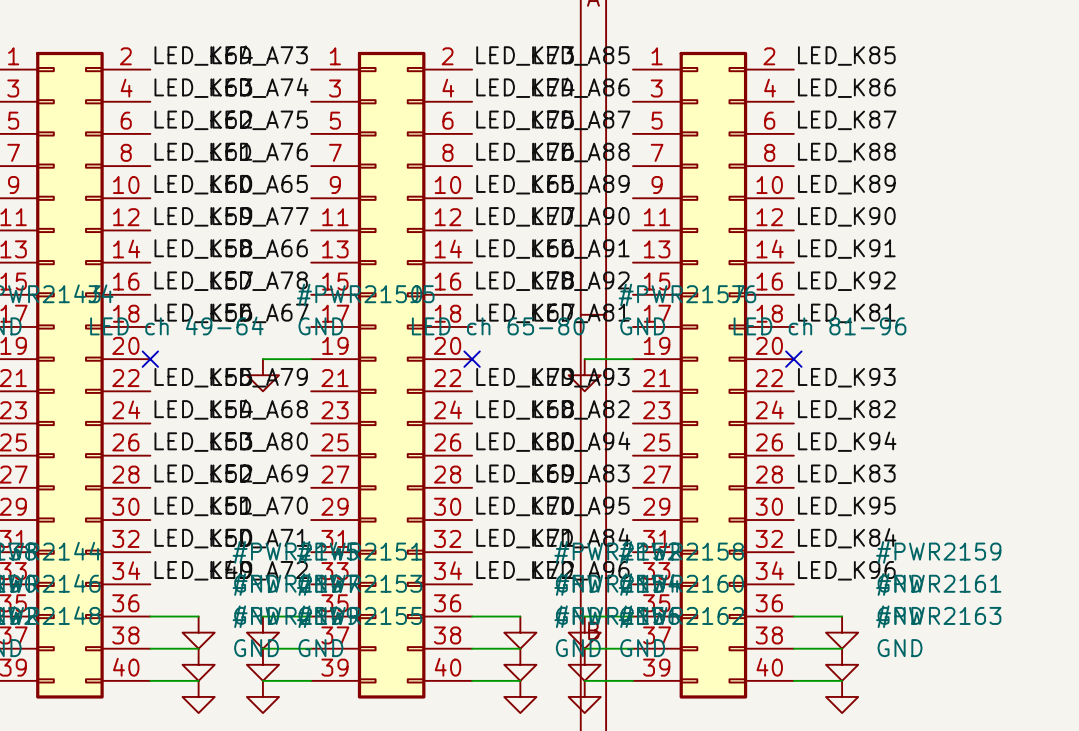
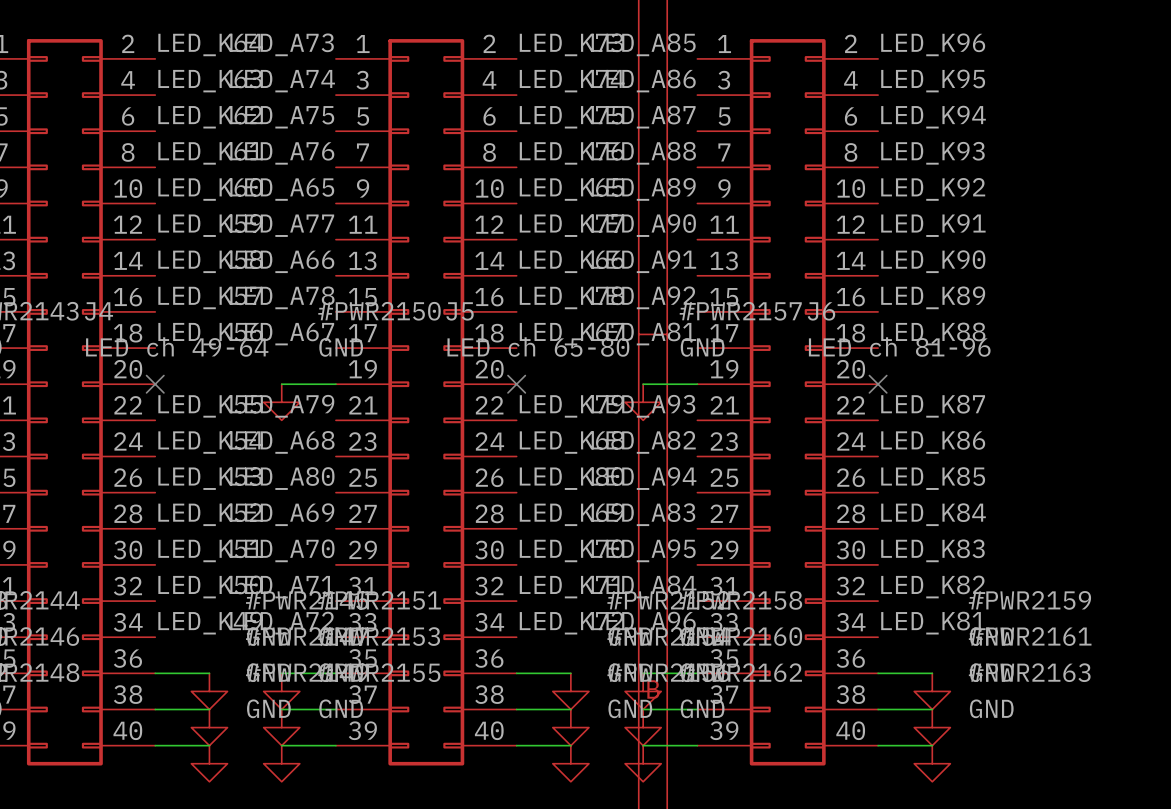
label: LED_K85 (846, 55) -> LED_K96 (933, 44)
label: LED_K86 (846, 88) -> LED_K95 (933, 80)
label: LED_K87 (847, 120) -> LED_K94 (933, 117)
label: LED_K88 (846, 152) -> LED_K93 (932, 153)
label: LED_K89 (846, 184) -> LED_K92 (933, 189)
label: LED_K90 (846, 216) -> LED_K91 (933, 225)
label: LED_K91 (846, 249) -> LED_K90 (933, 261)
label: LED_K92 (846, 281) -> LED_K89 (933, 297)
label: LED_K81 (846, 313) -> LED_K88 (933, 333)
label: LED_K93 (846, 377) -> LED_K87 (933, 406)
label: LED_K82 (846, 409) -> LED_K86 (933, 442)
label: LED_K94 (847, 441) -> LED_K85 (933, 478)
label: LED_K83 (846, 474) -> LED_K84 (933, 514)
label: LED_K95 (846, 506) -> LED_K83 (932, 550)
label: LED_K84 (847, 538) -> LED_K82 (933, 586)
label: LED_K96 (846, 570) -> LED_K81 (933, 623)

